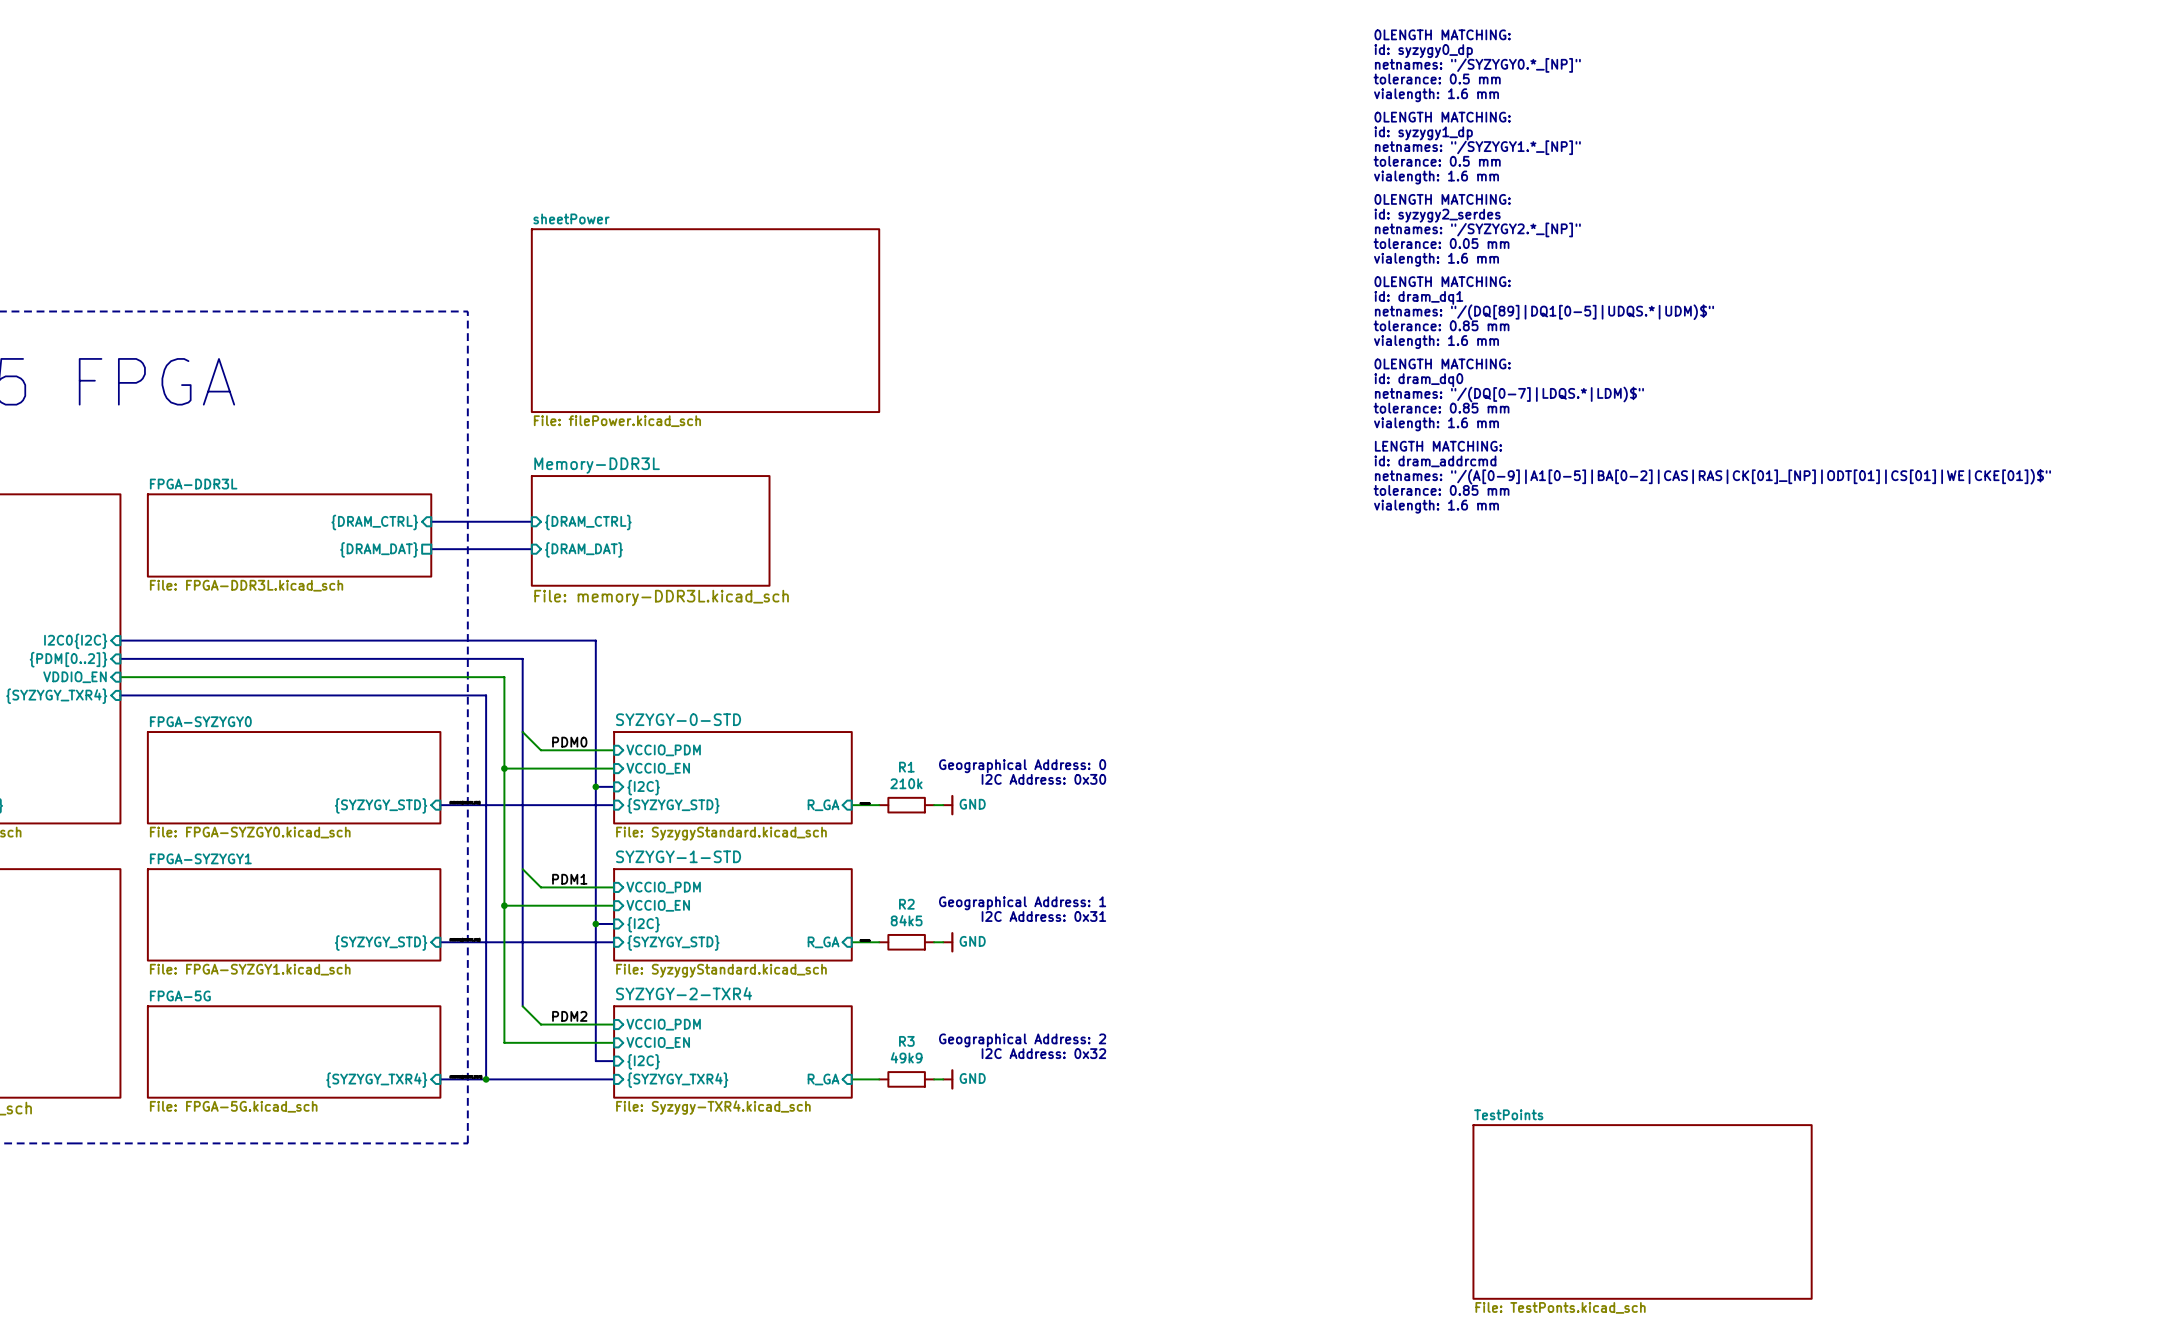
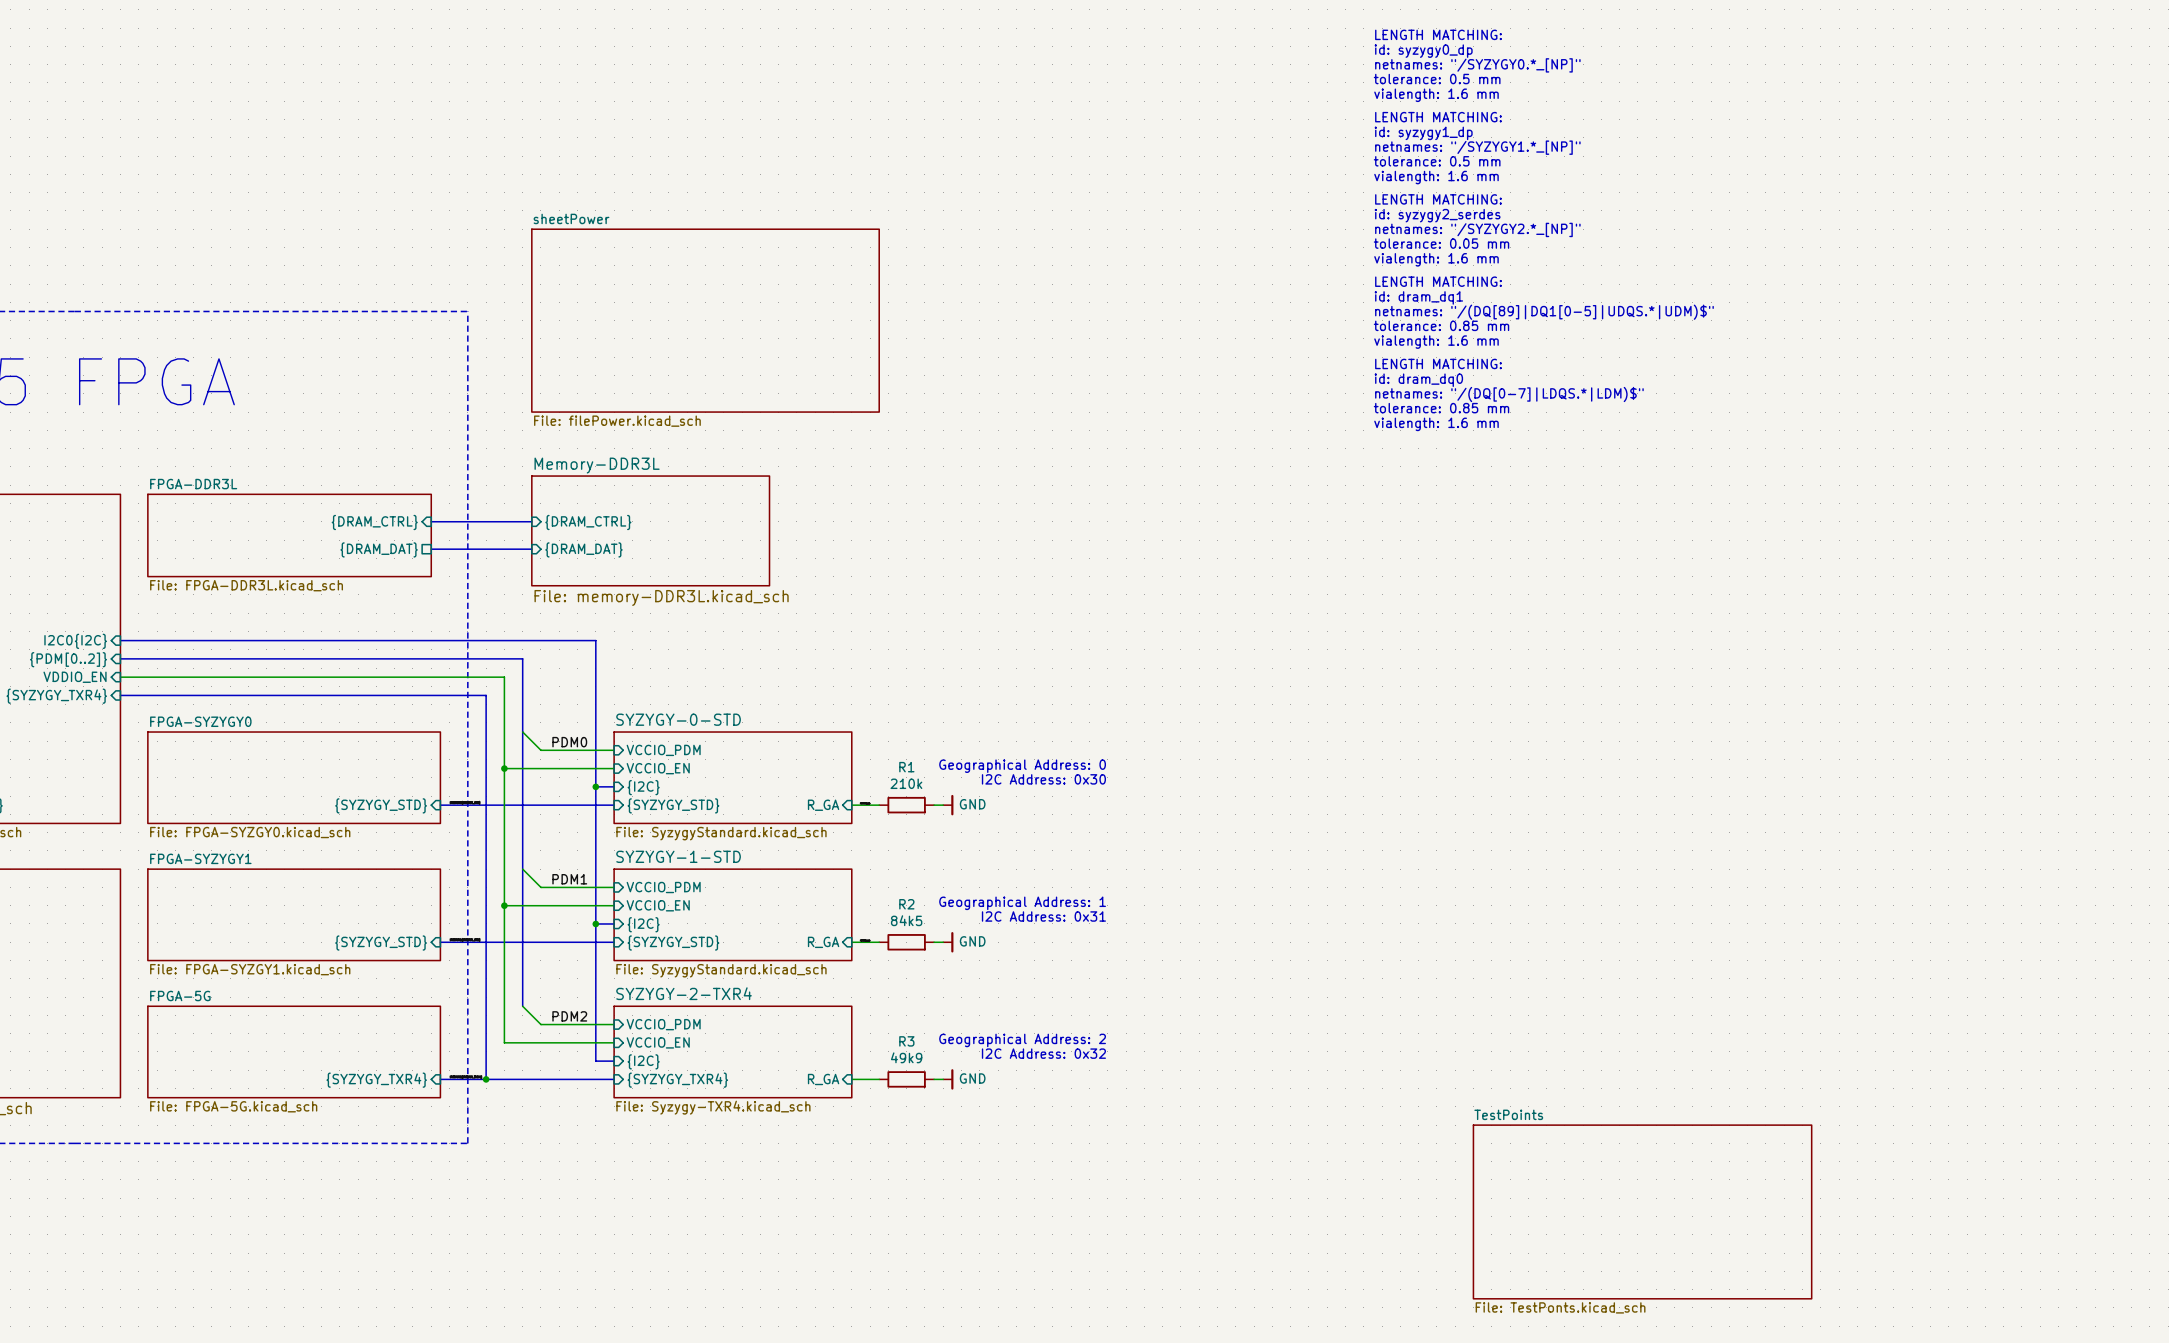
text: 0LENGTH MATCHING: (1442, 34) -> LENGTH MATCHING: (1438, 34)
text: 0LENGTH MATCHING: (1442, 117) -> LENGTH MATCHING: (1438, 117)
text: 0LENGTH MATCHING: (1442, 199) -> LENGTH MATCHING: (1438, 199)
text: 0LENGTH MATCHING: (1442, 281) -> LENGTH MATCHING: (1438, 281)
text: 0LENGTH MATCHING: (1442, 363) -> LENGTH MATCHING: (1438, 363)
text: LENGTH MATCHING: (1438, 446) -> none
text: id: dram_addrcmd (1435, 461) -> none
text: netnames: "/(A[0-9]|A1[0-5]|BA[0-2]|CAS|RAS|CK[01]_[NP]|ODT[01]|CS[01]|WE|CKE[01])$" (1712, 476) -> none
text: tolerance: 0.85 mm (1441, 490) -> none
text: vialength: 1.6 mm (1436, 506) -> none

